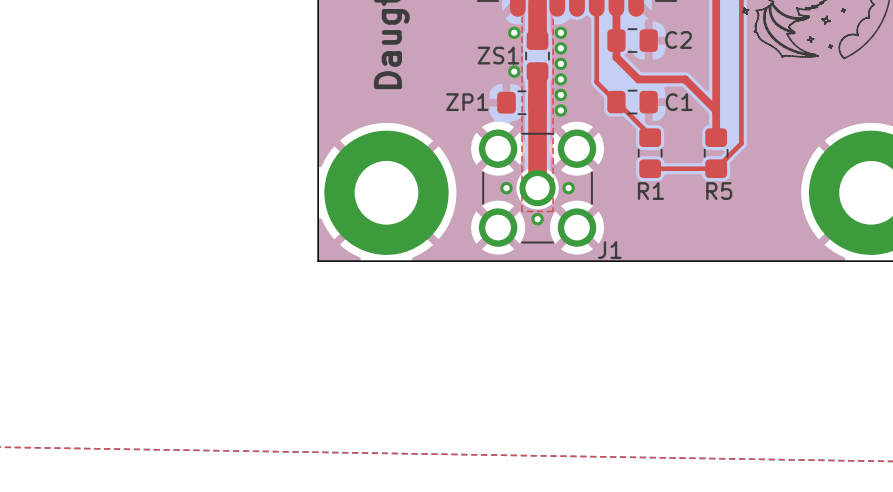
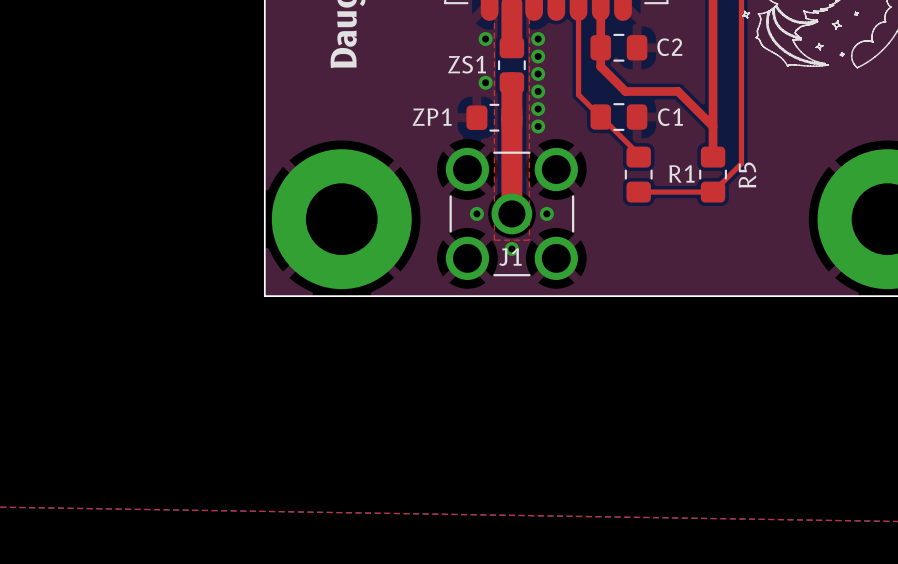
R1 name position: R1 (650, 191) -> R1 (681, 173)
R5 name rotation: 0° (719, 191) -> 90° counterclockwise (747, 175)
R5 name position: R5 (719, 191) -> R5 (747, 175)
J1 name position: J1 (609, 250) -> J1 (510, 257)

